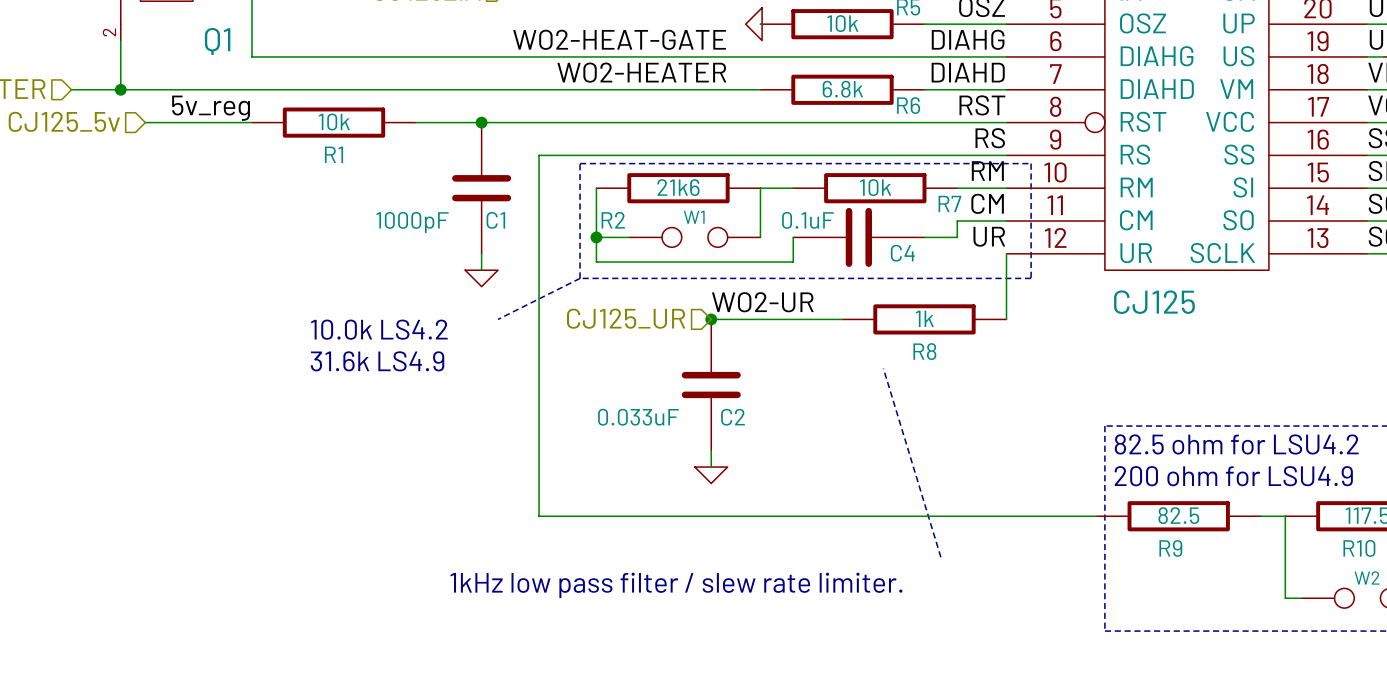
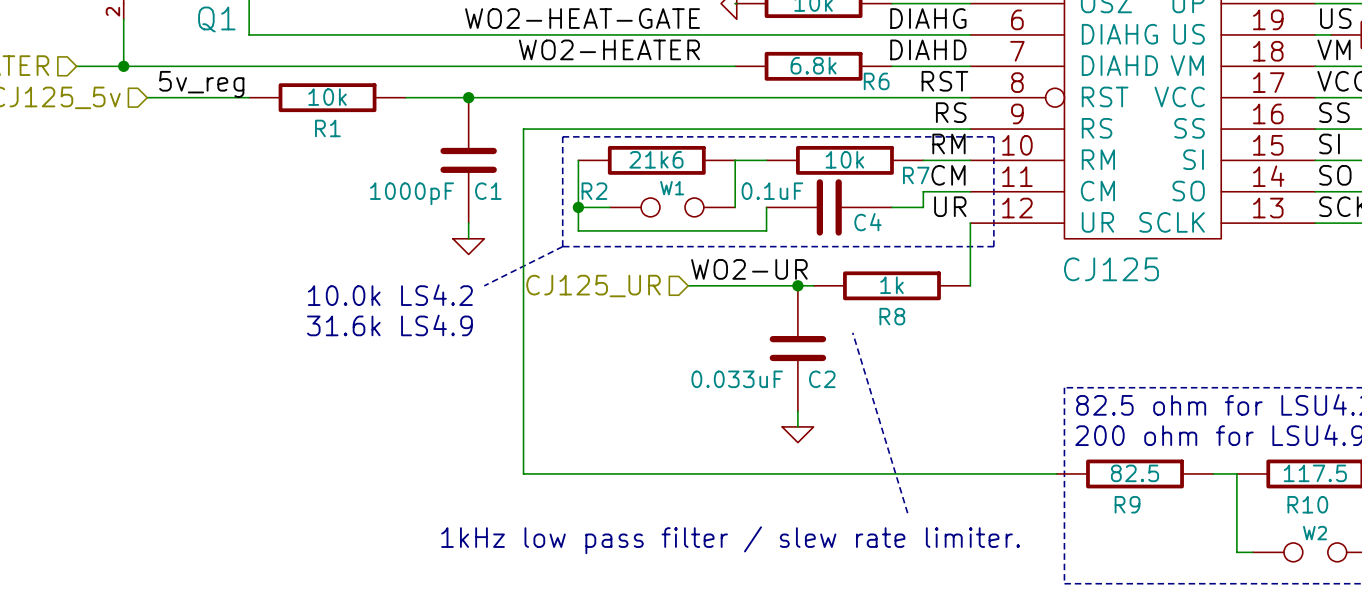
junction: (711, 319) -> none
junction: none -> (797, 285)
C2 position: (711, 385) -> (797, 348)
wire: (711, 450) (711, 467) -> (797, 411) (797, 426)
power symbol position: (711, 475) -> (797, 434)

